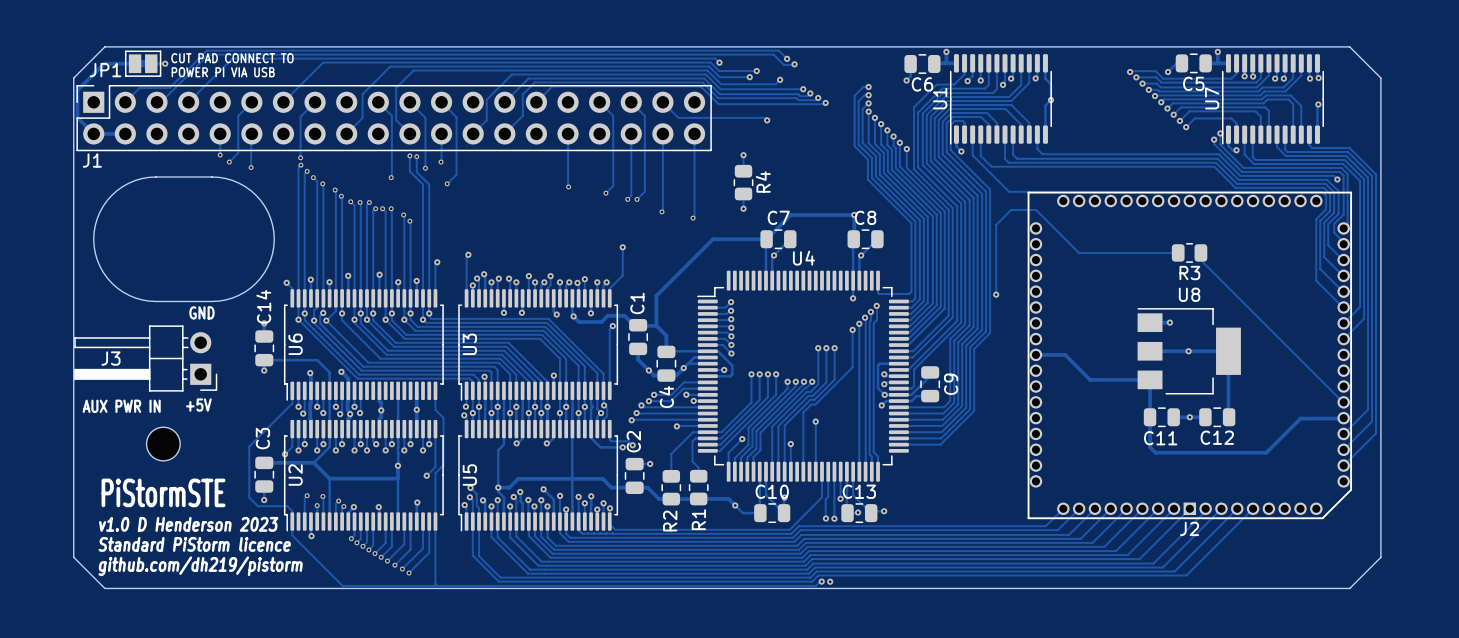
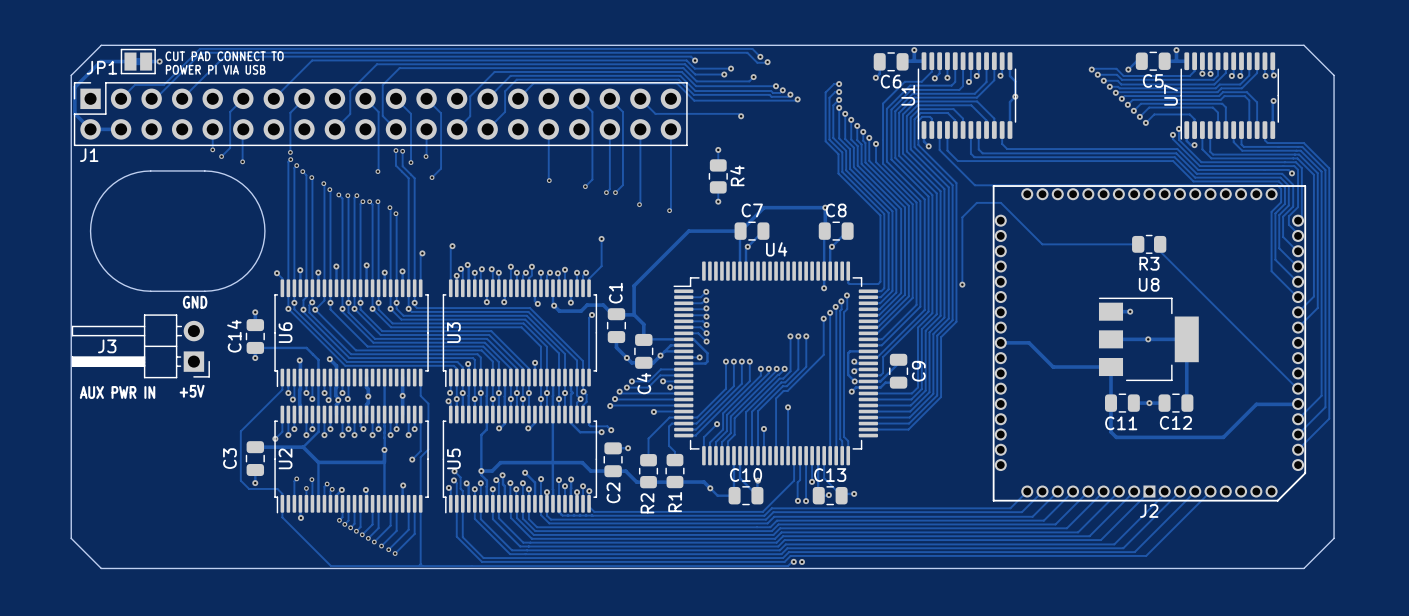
C14 name position: C14 (263, 306) -> C14 (234, 336)
C3 name position: C3 (262, 438) -> C3 (229, 458)
C2 name position: C2 (633, 441) -> C2 (613, 492)
part: (163, 444) -> none
text: PiStormSTE (163, 492) -> none
text: v1.0 D Henderson 2023 (188, 524) -> none
text: Standard PiStorm licence (194, 544) -> none
text: github.com/dh219/pistorm (200, 566) -> none

